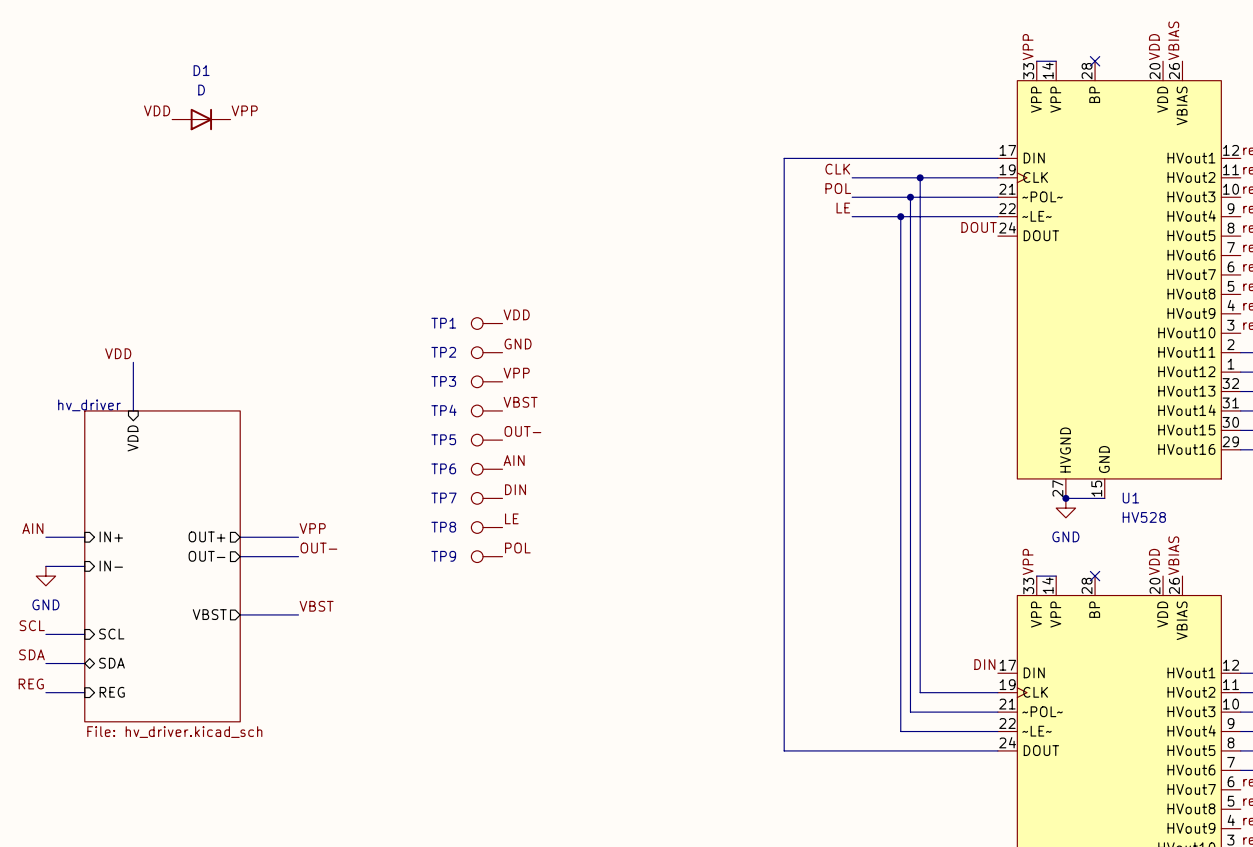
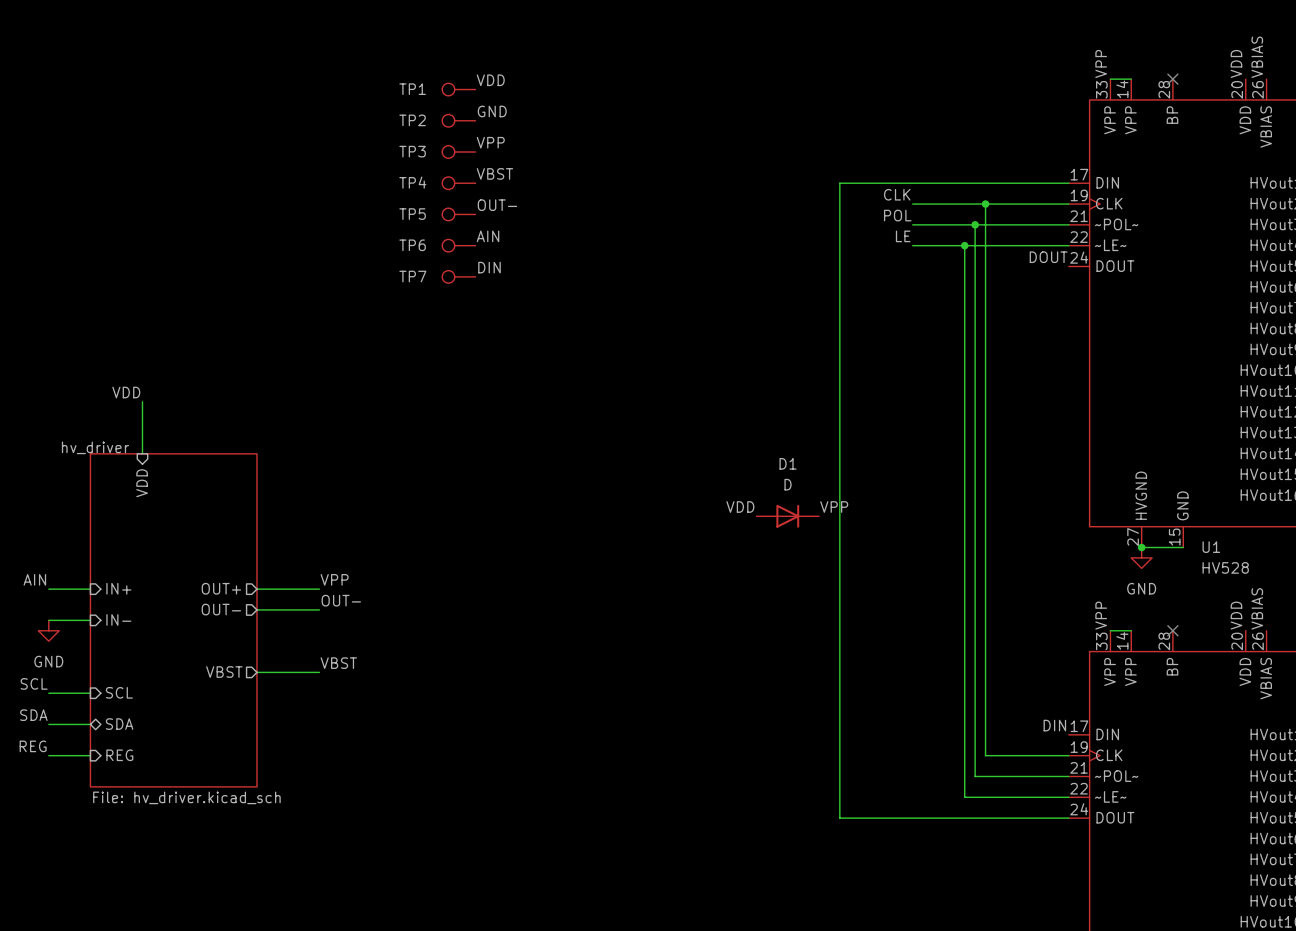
label: none -> VDD (490, 80)
label: none -> GND (492, 111)
label: VDD (157, 110) -> none
label: VPP (244, 110) -> none
D1 position: (201, 119) -> (787, 516)
label: none -> VPP (490, 142)
label: none -> VBST (494, 173)
label: none -> OUT- (497, 205)
label: none -> AIN (488, 236)
label: none -> DIN (489, 267)
label: VDD (516, 314) -> none
TP1 position: (486, 323) -> (458, 89)
label: GND (518, 344) -> none
TP2 position: (486, 352) -> (458, 120)
label: VPP (516, 373) -> none
TP3 position: (486, 381) -> (458, 152)
label: VBST (520, 402) -> none
TP4 position: (486, 410) -> (458, 183)
label: OUT- (522, 431) -> none
TP5 position: (486, 440) -> (458, 214)
label: AIN (514, 460) -> none
label: none -> VDD (740, 507)
label: none -> VPP (834, 507)
TP6 position: (486, 469) -> (458, 245)
label: DIN (515, 489) -> none
TP7 position: (486, 498) -> (458, 276)
label: LE (511, 518) -> none
TP8: (486, 527) -> none
label: POL (517, 548) -> none
TP9: (486, 556) -> none

